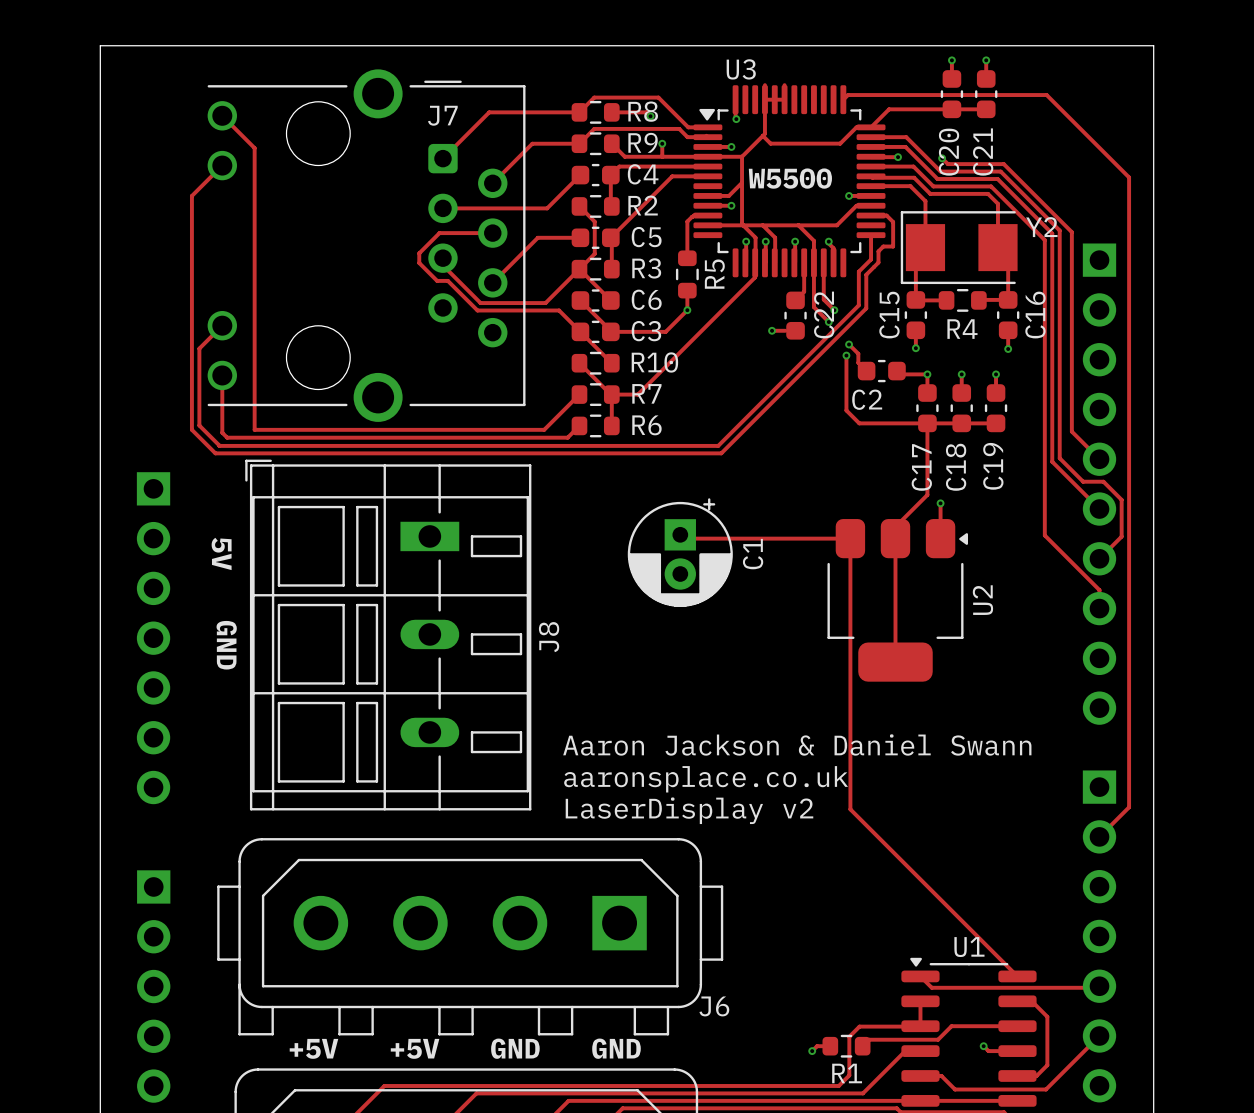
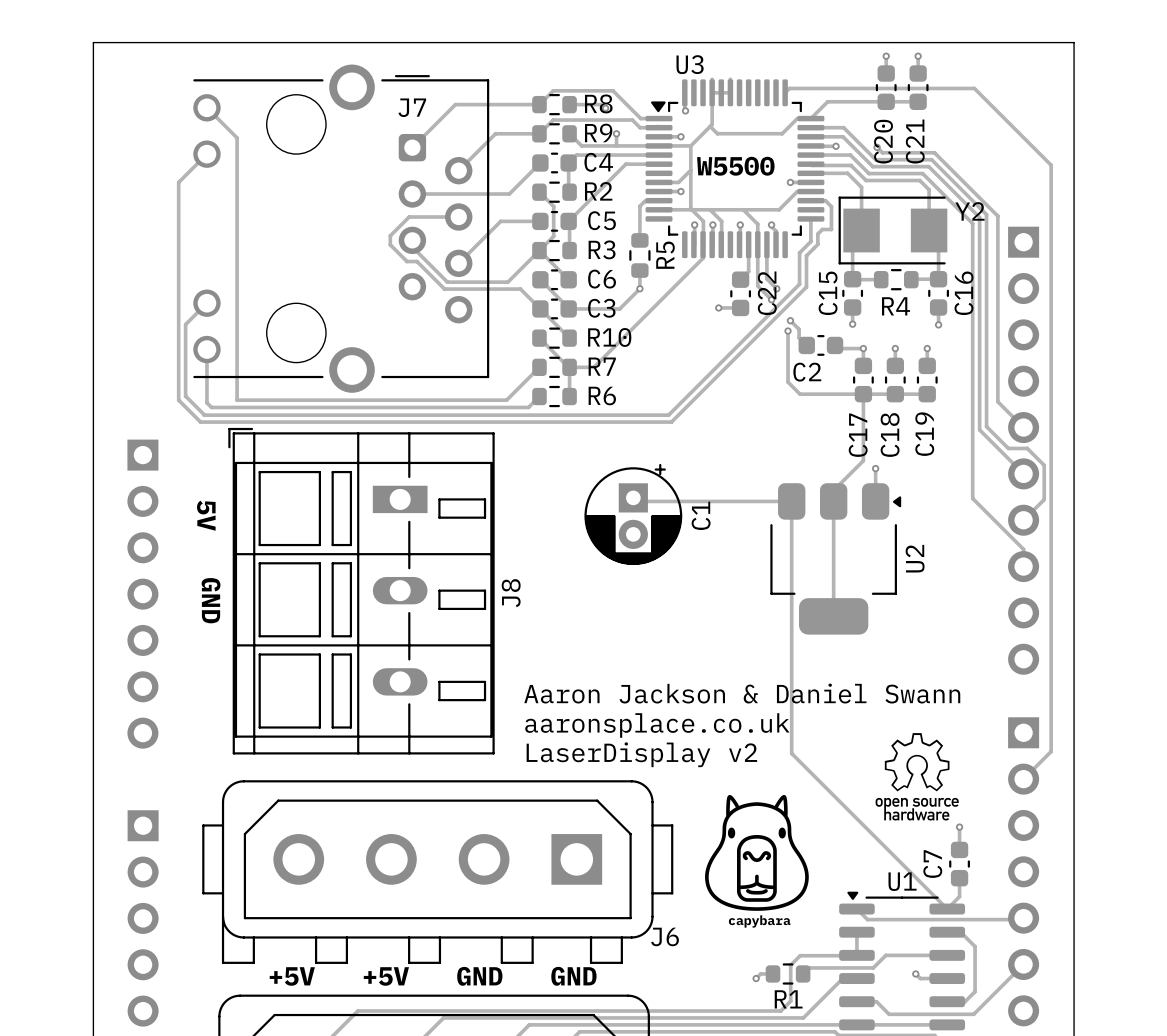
drawing: none -> [875, 733, 959, 821]
drawing: none -> [705, 794, 809, 911]
track: none -> (959, 827) (959, 849)
via: none -> (959, 827)
C7: none -> (959, 864)
track: none -> (959, 878) (959, 896) (947, 909)
text: none -> capybara (759, 921)

